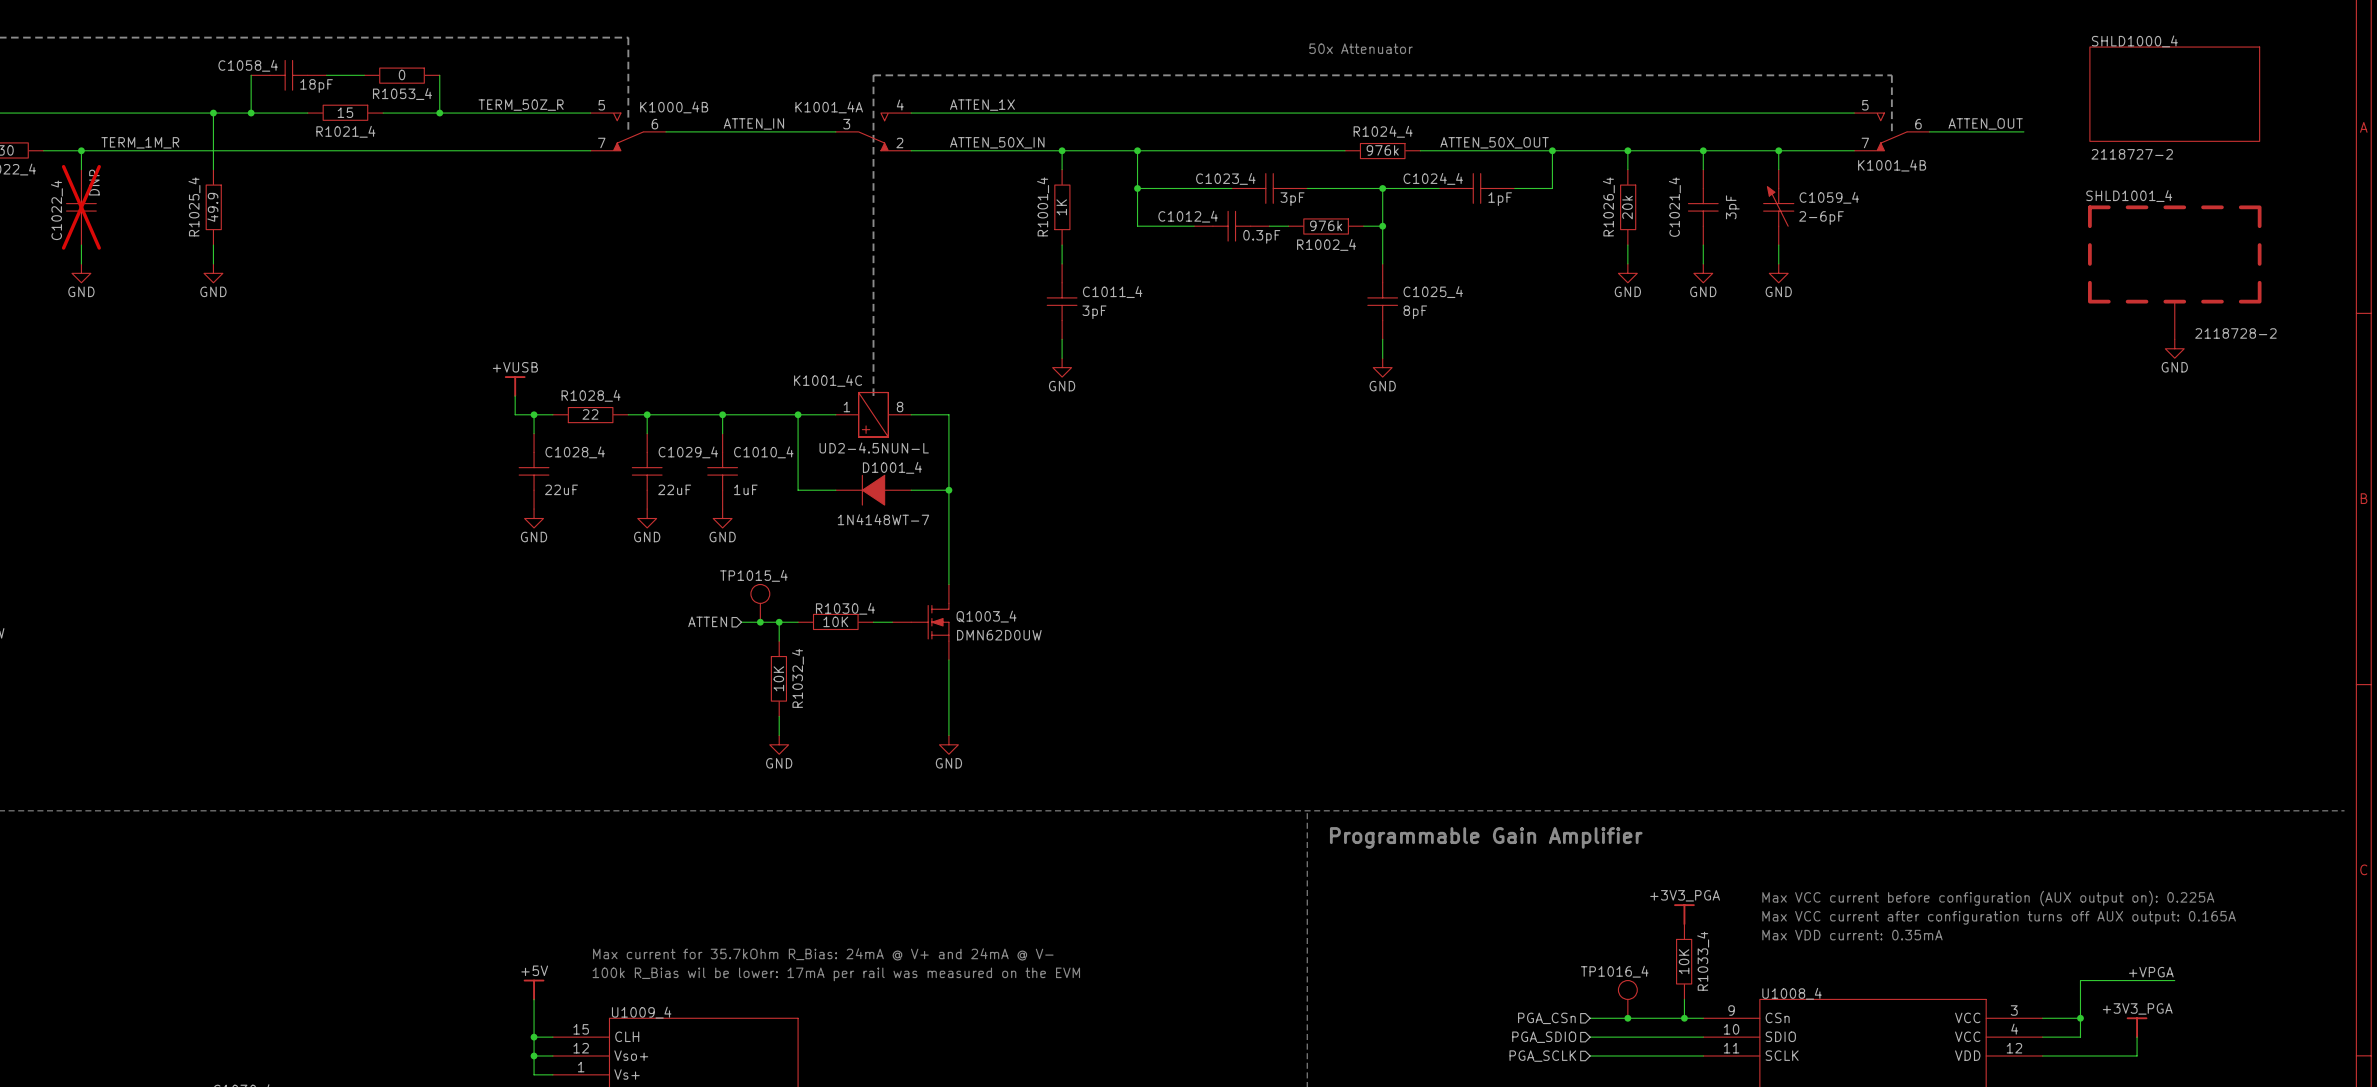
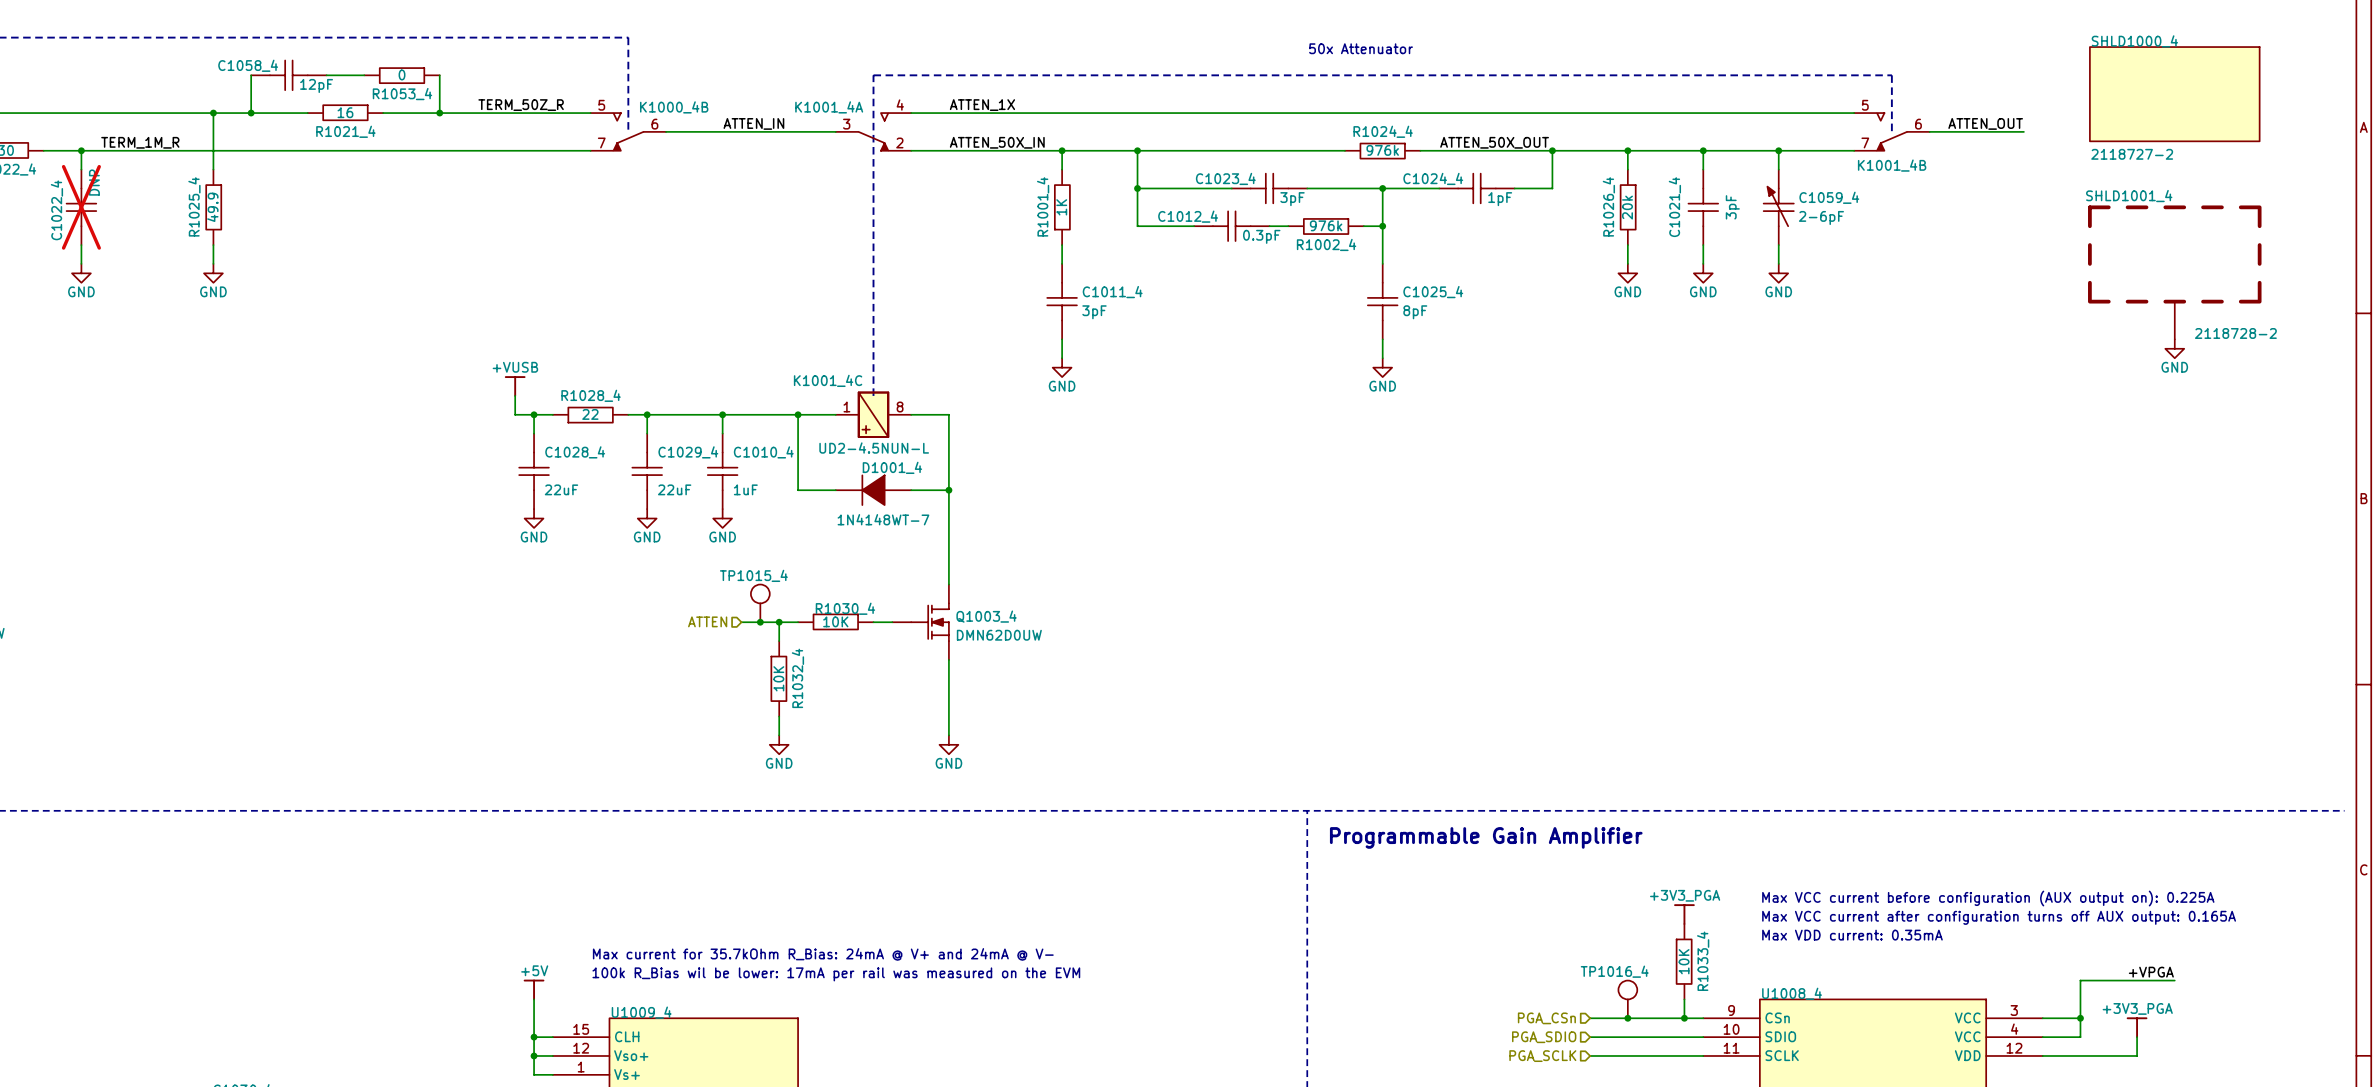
C1058_4 value: 18pF (316, 85) -> 12pF (316, 85)
R1021_4 value: 15 (345, 112) -> 16 (345, 112)

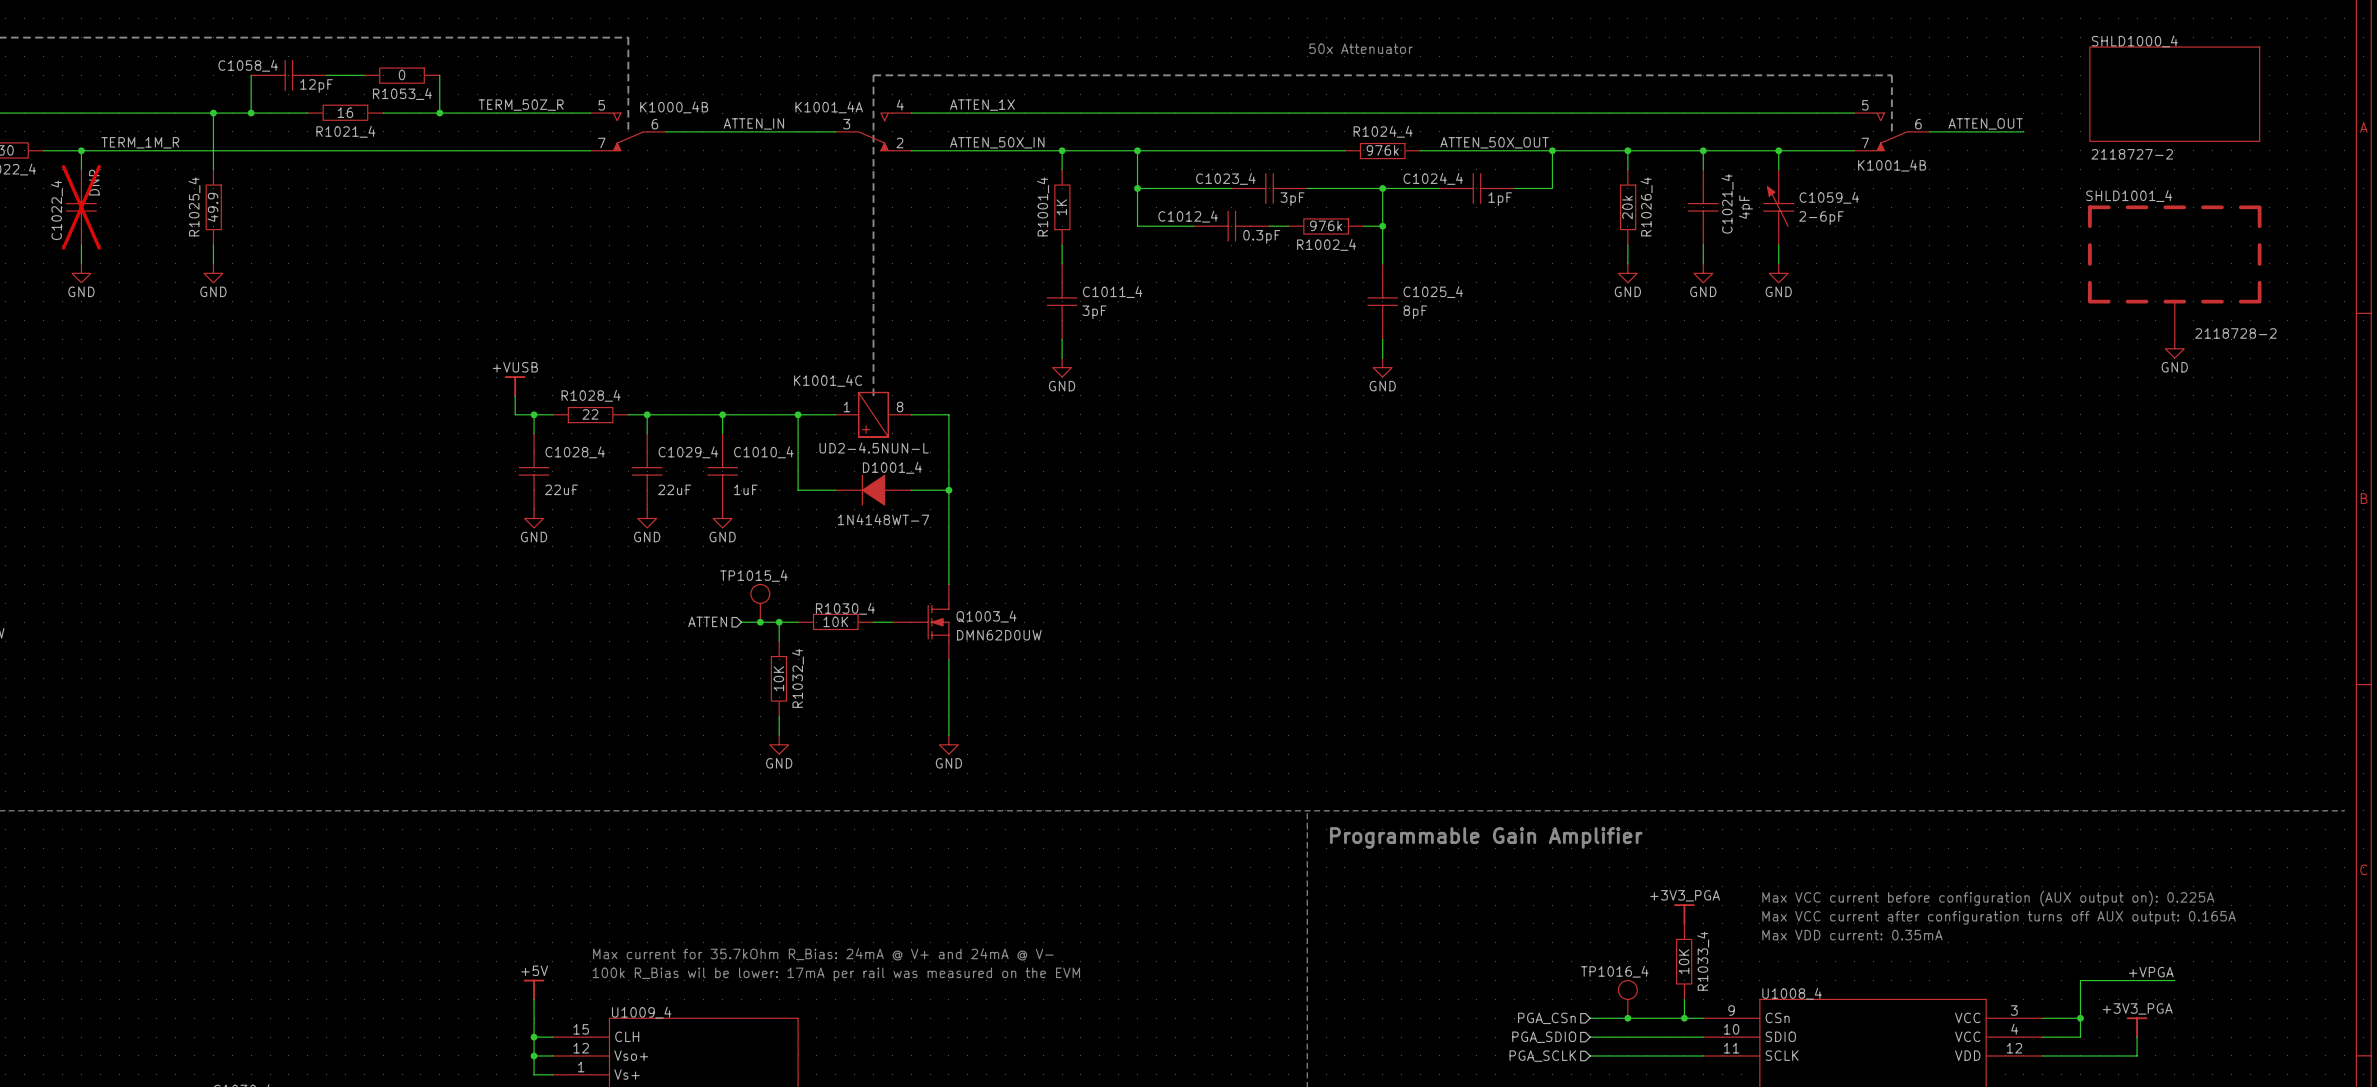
R1026_4 name position: R1026_4 (1608, 206) -> R1026_4 (1646, 206)
C1021_4 name position: C1021_4 (1674, 207) -> C1021_4 (1727, 203)
C1021_4 value: 3pF (1732, 207) -> 4pF (1745, 207)

